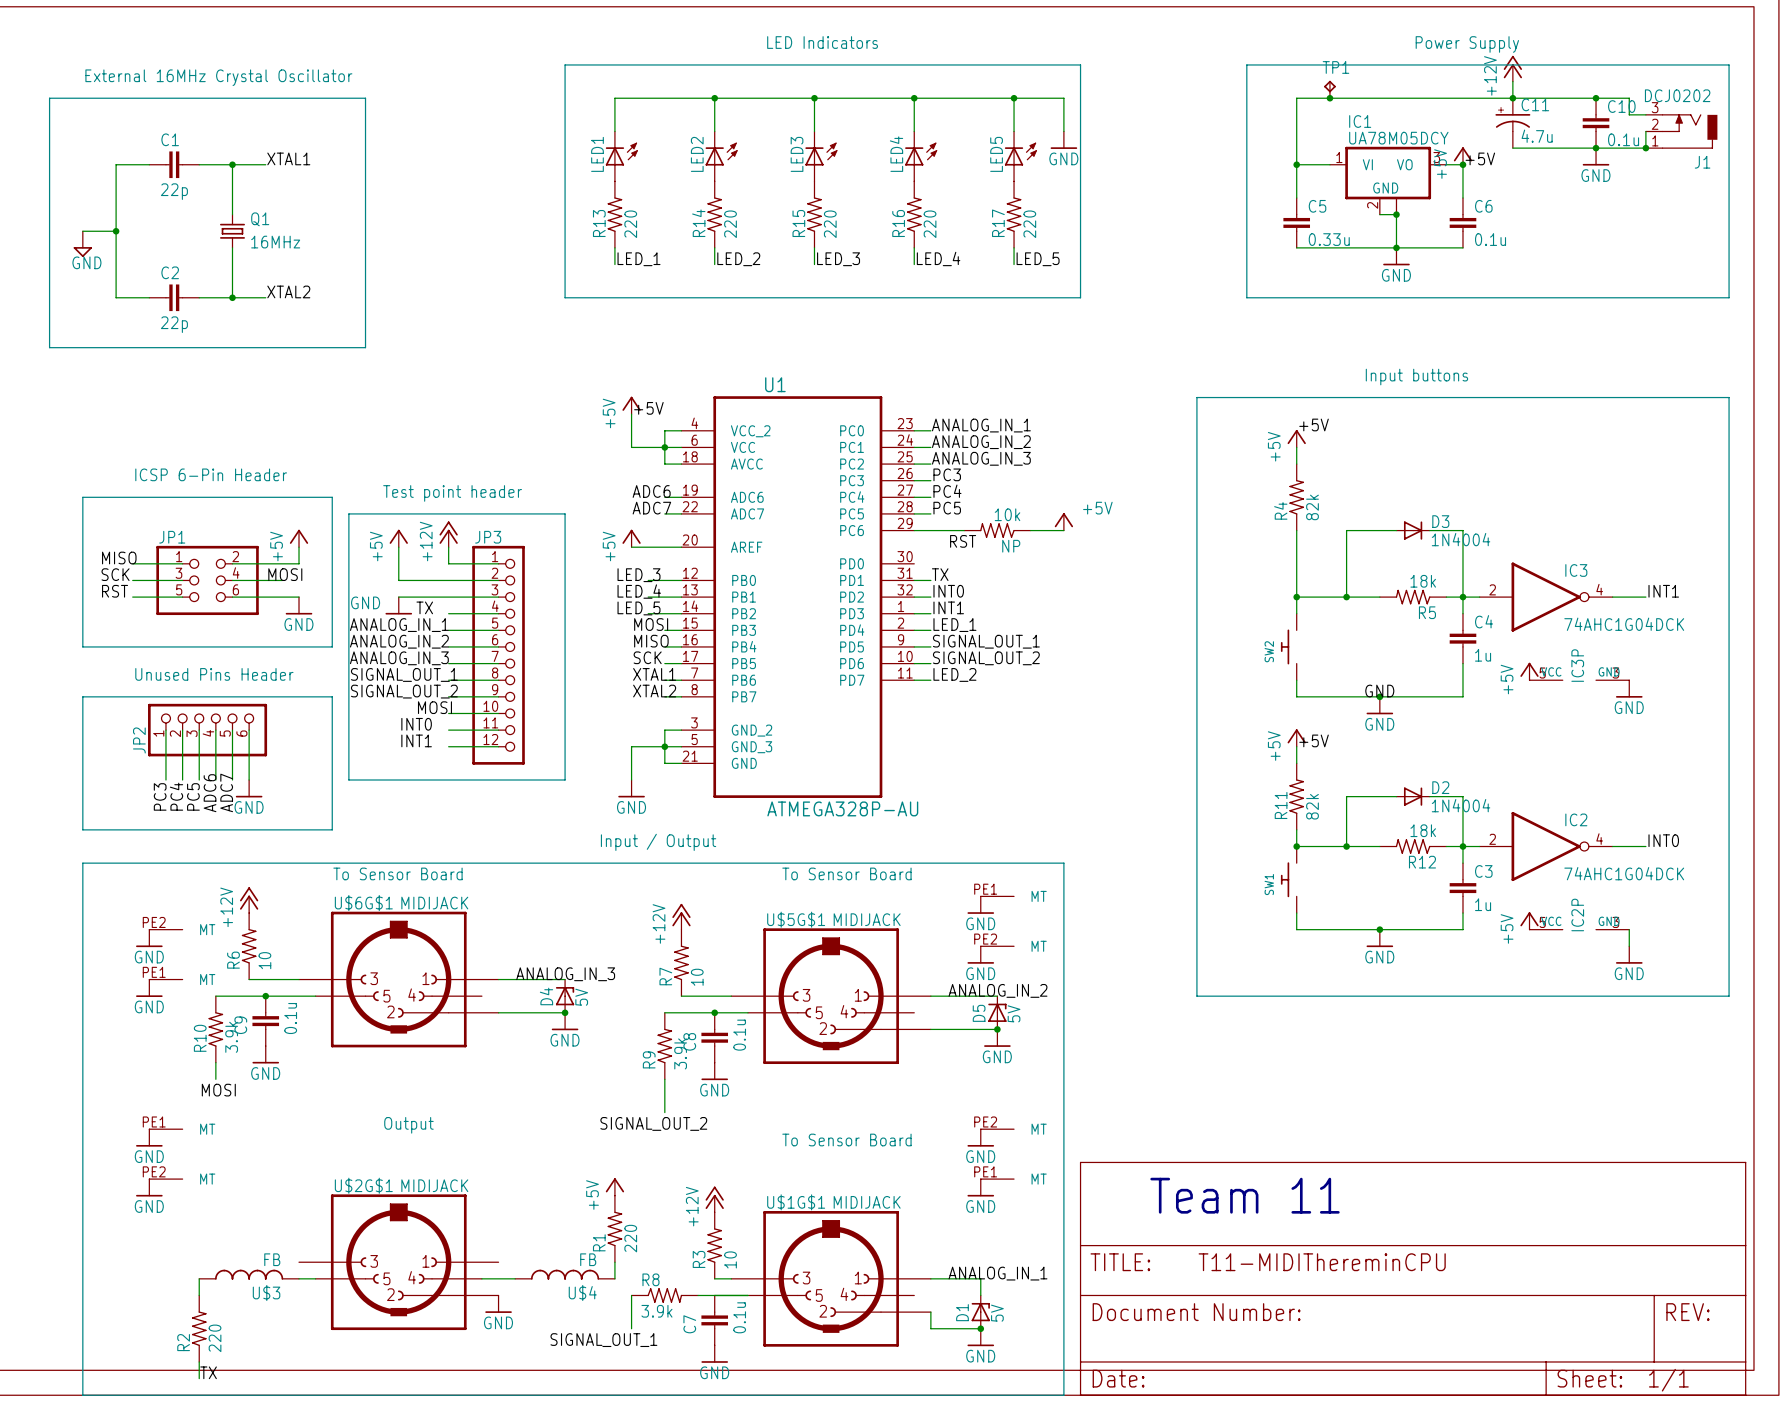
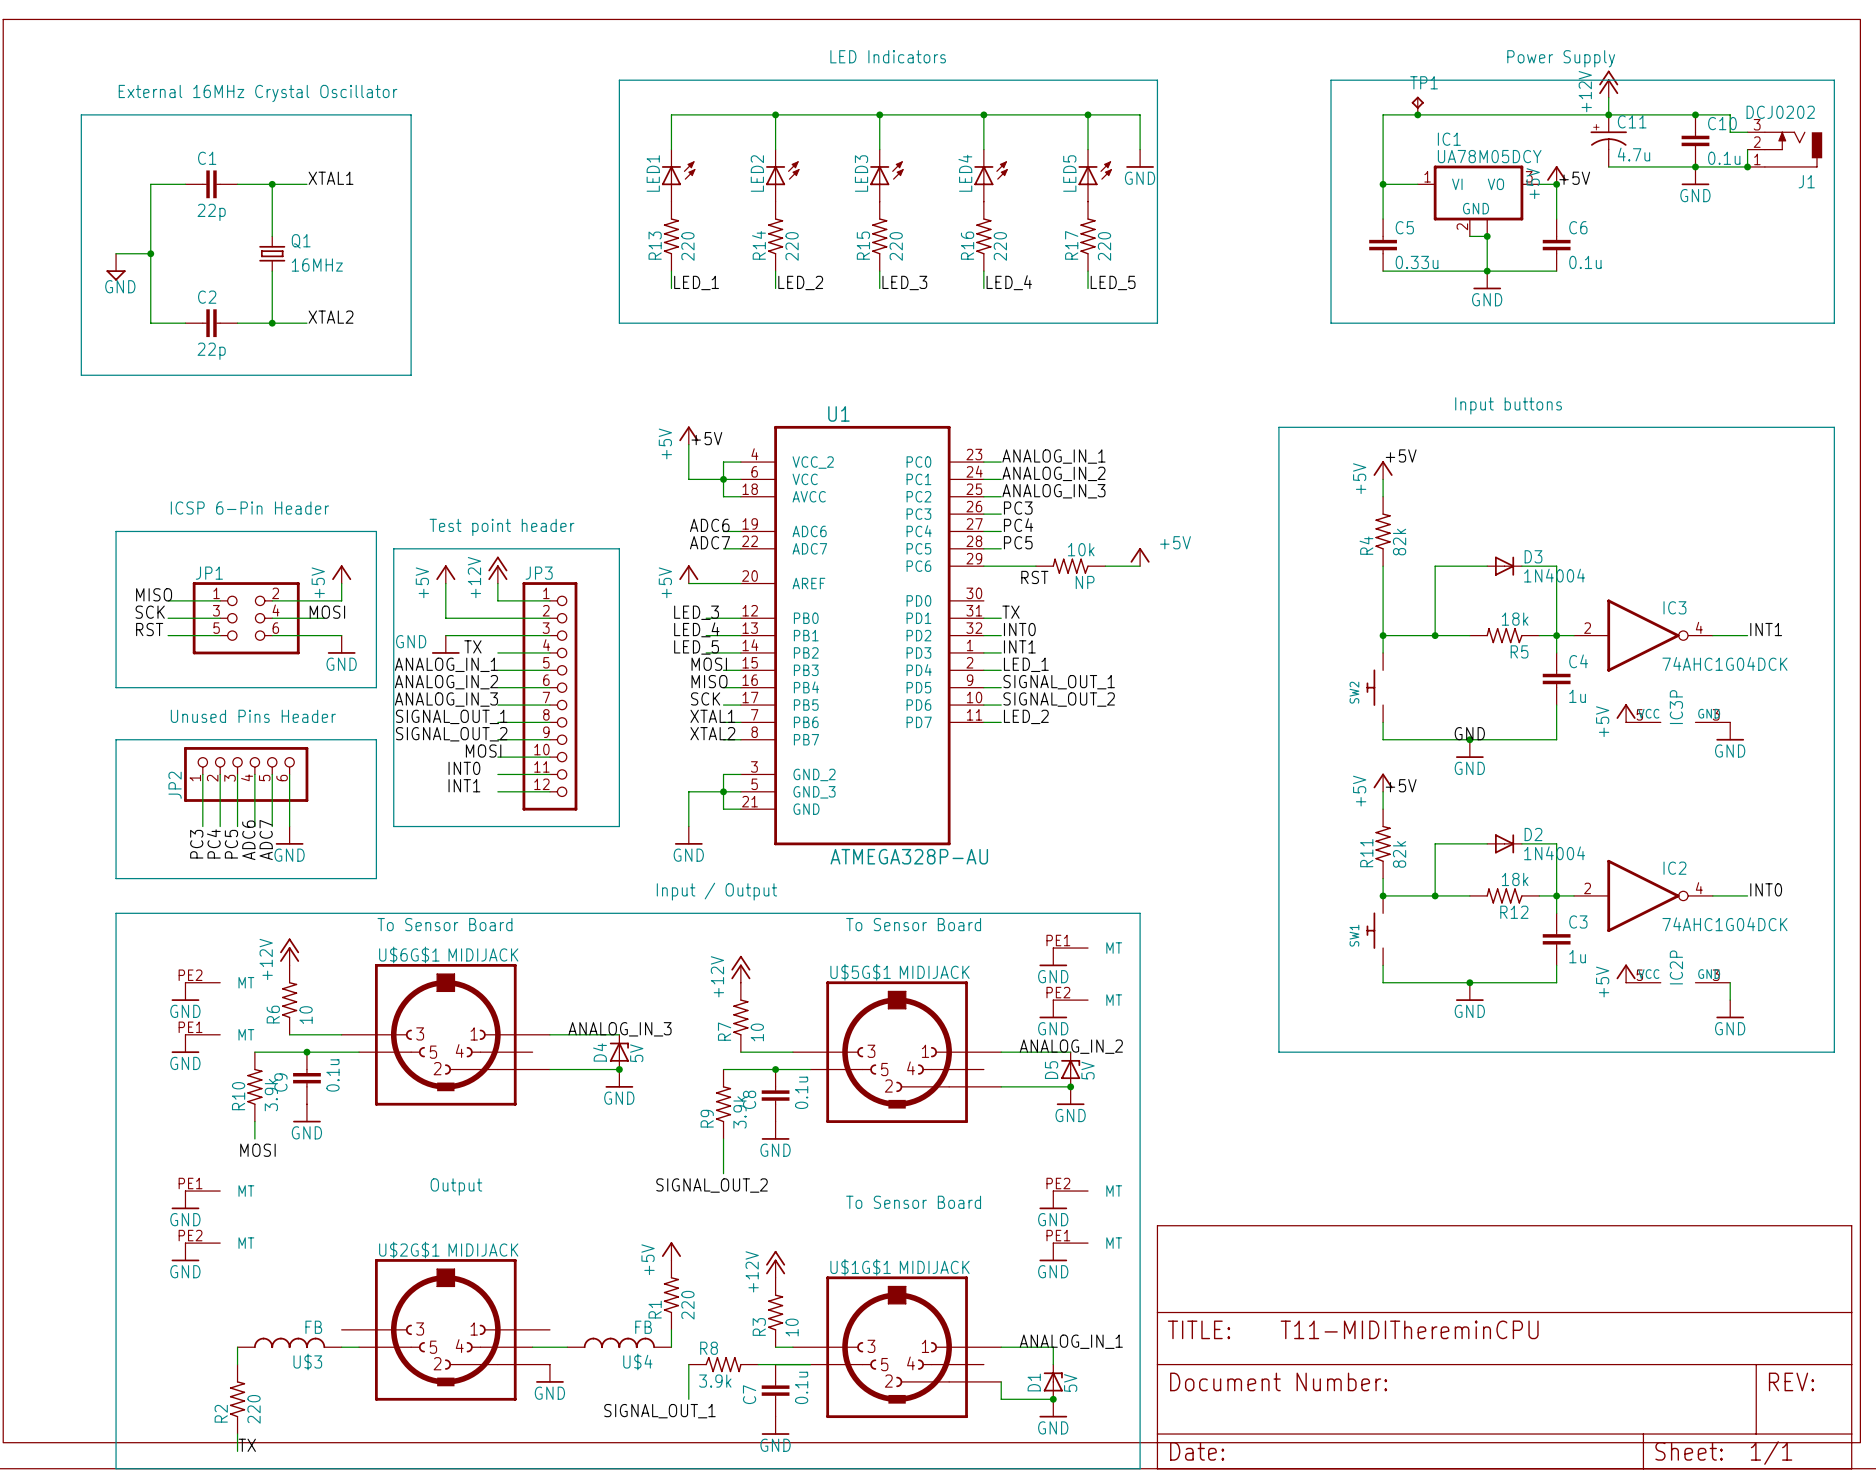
text: Team 11 (1245, 1195) -> none

